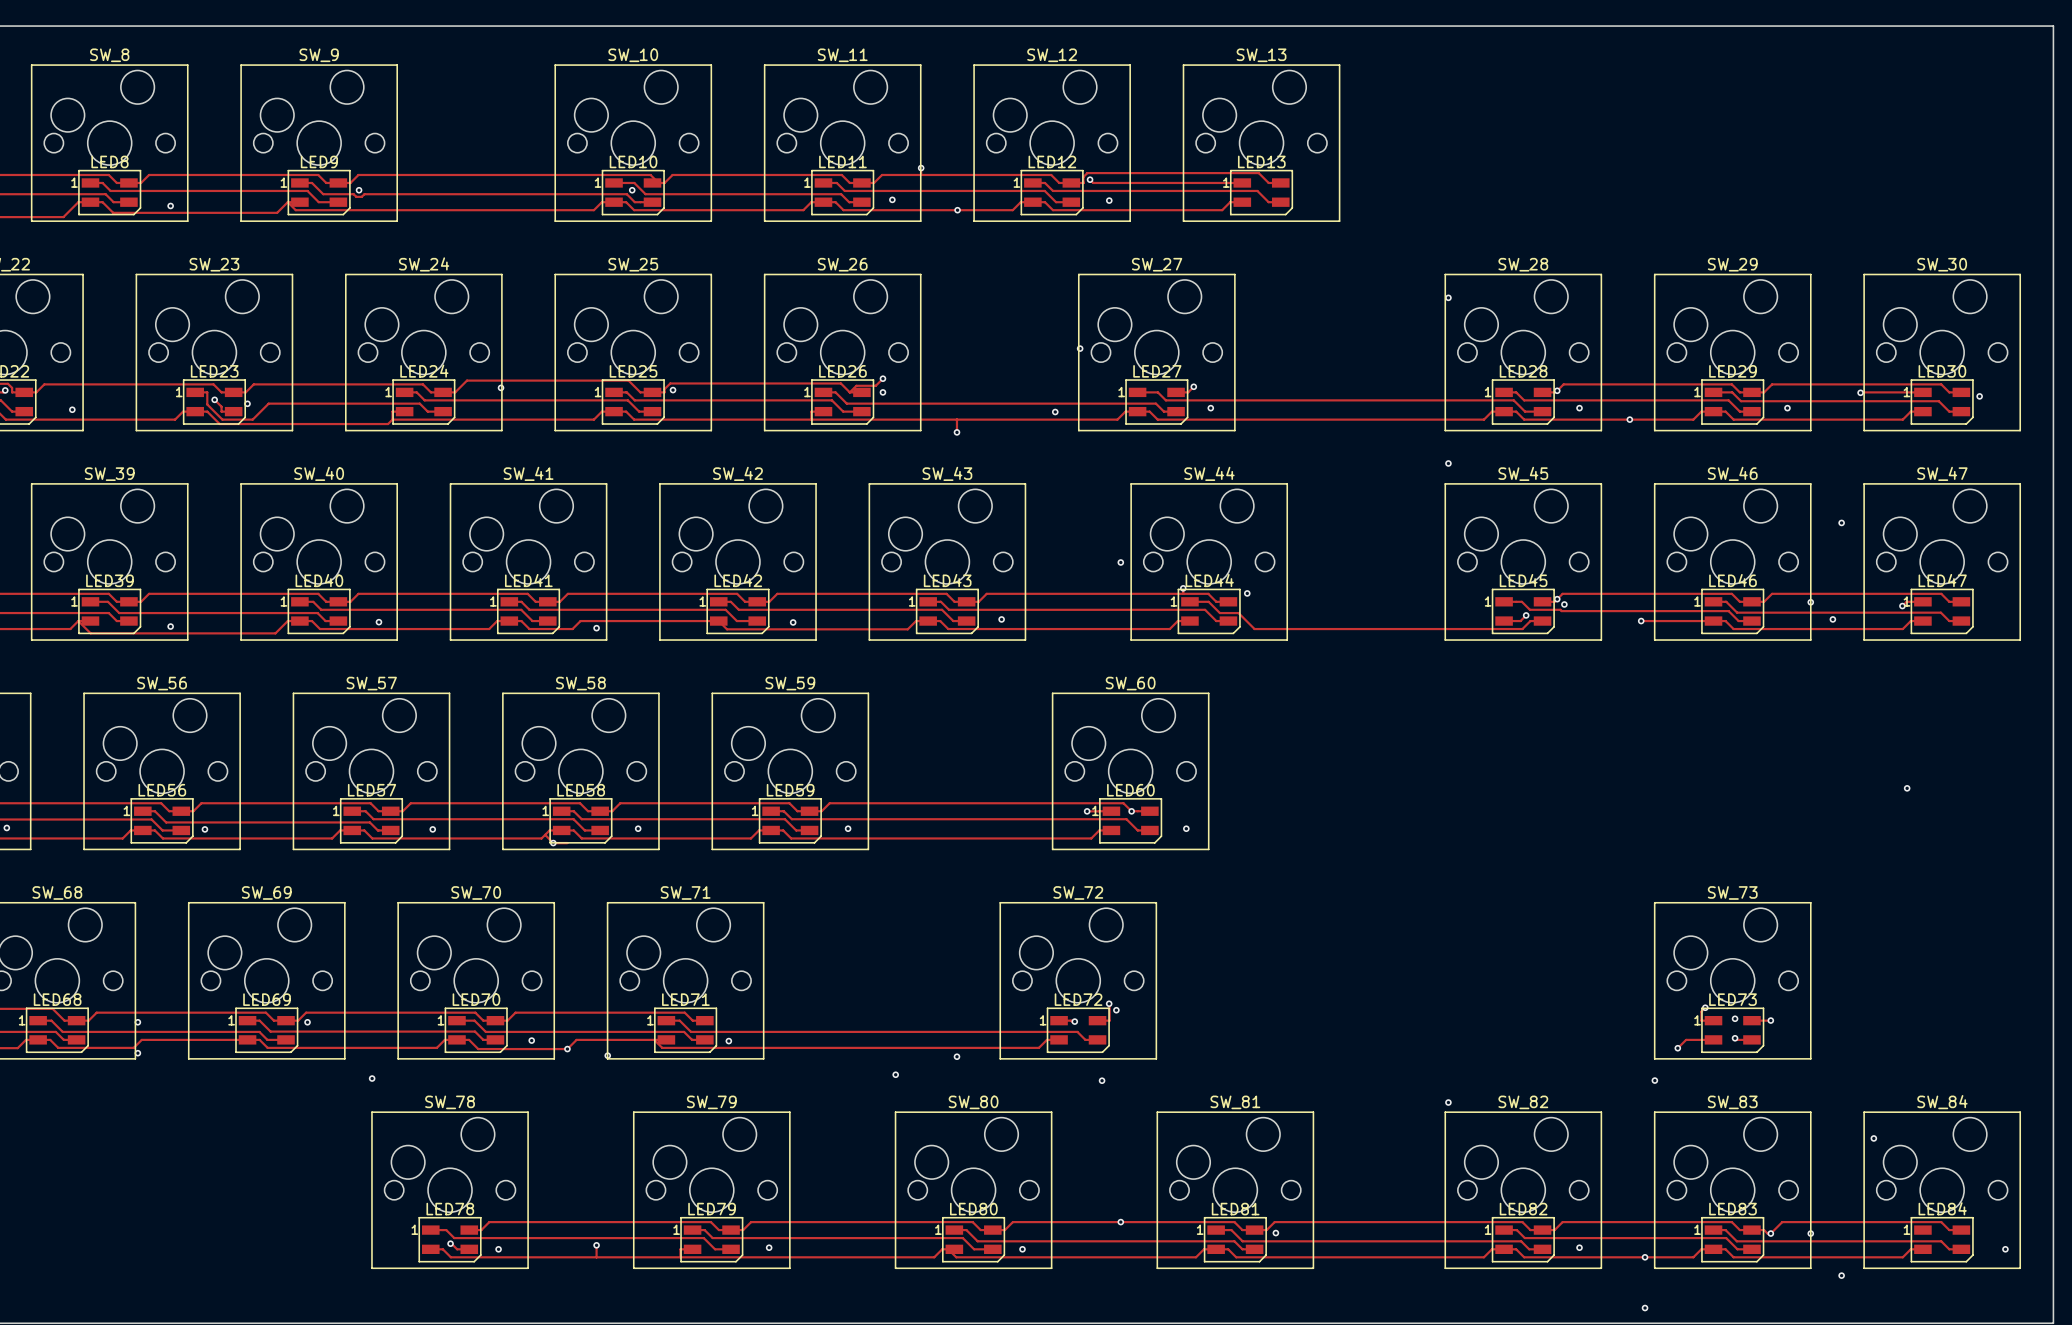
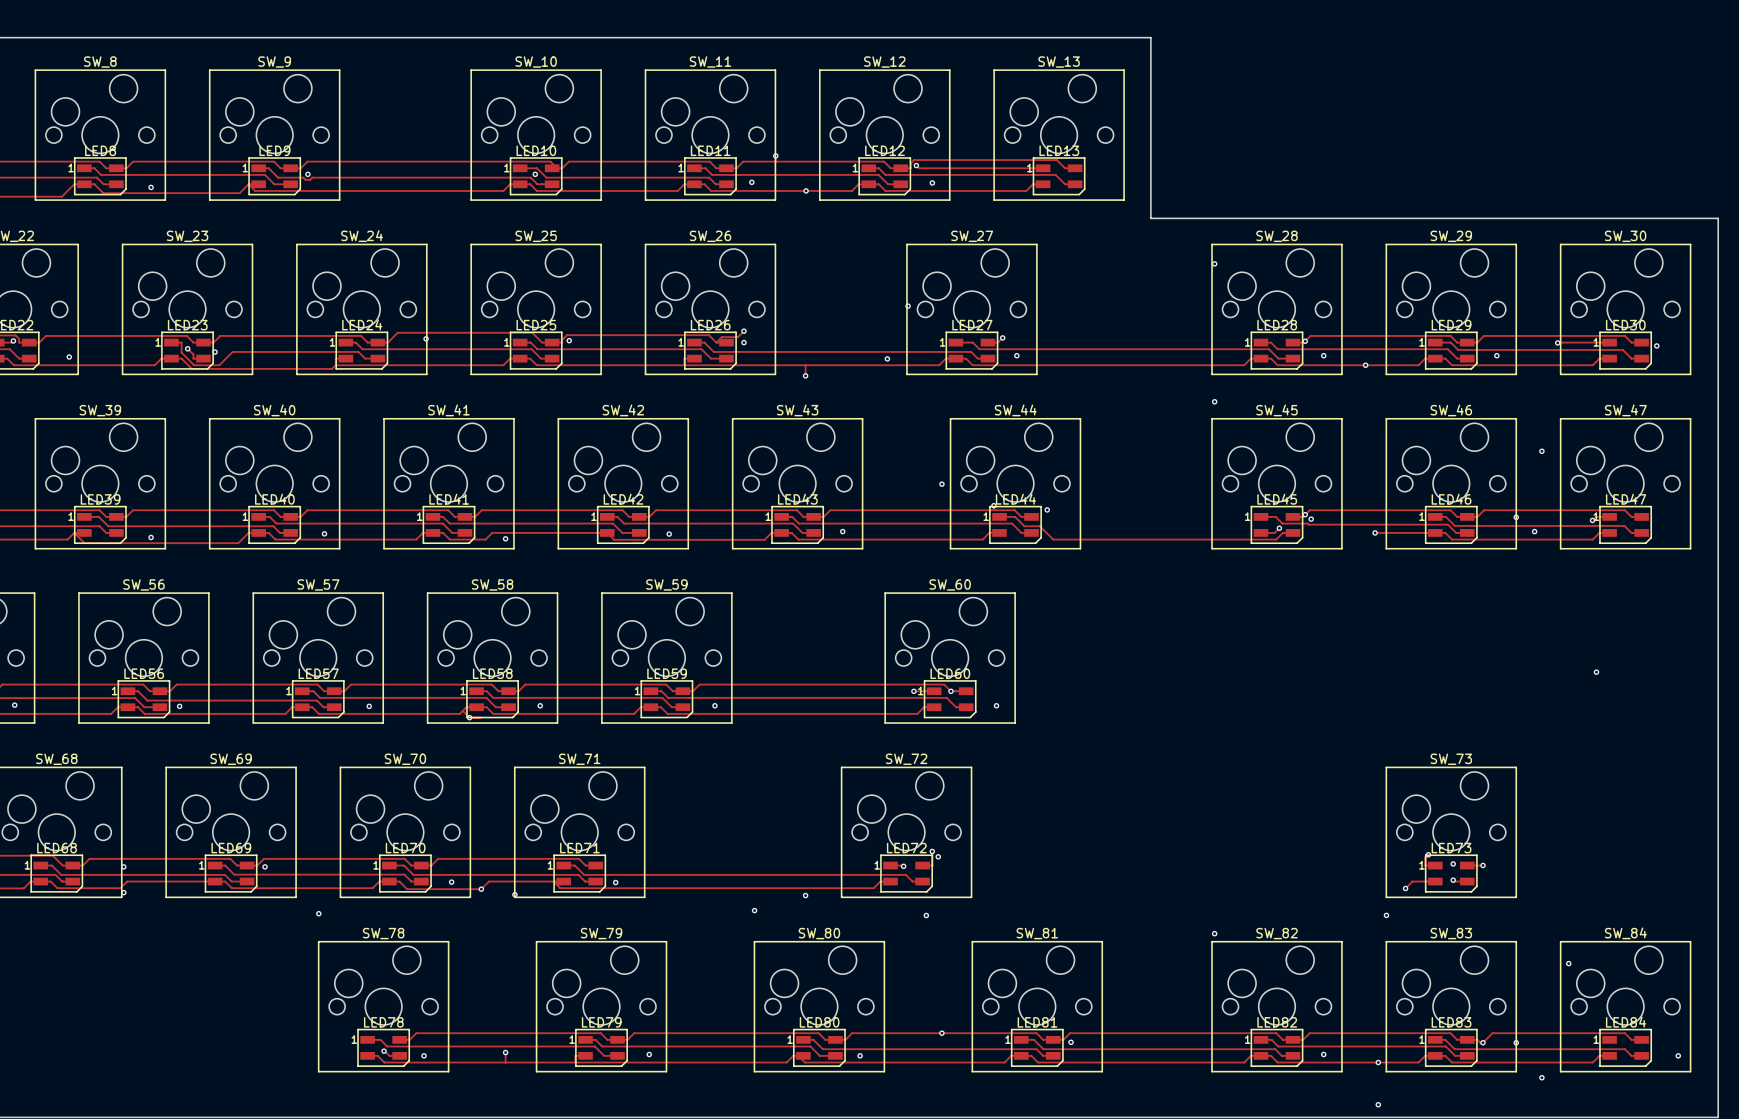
board edge: (1371, 26) (2053, 26) (2053, 243) -> (1150, 37) (1150, 218) (1718, 218)

